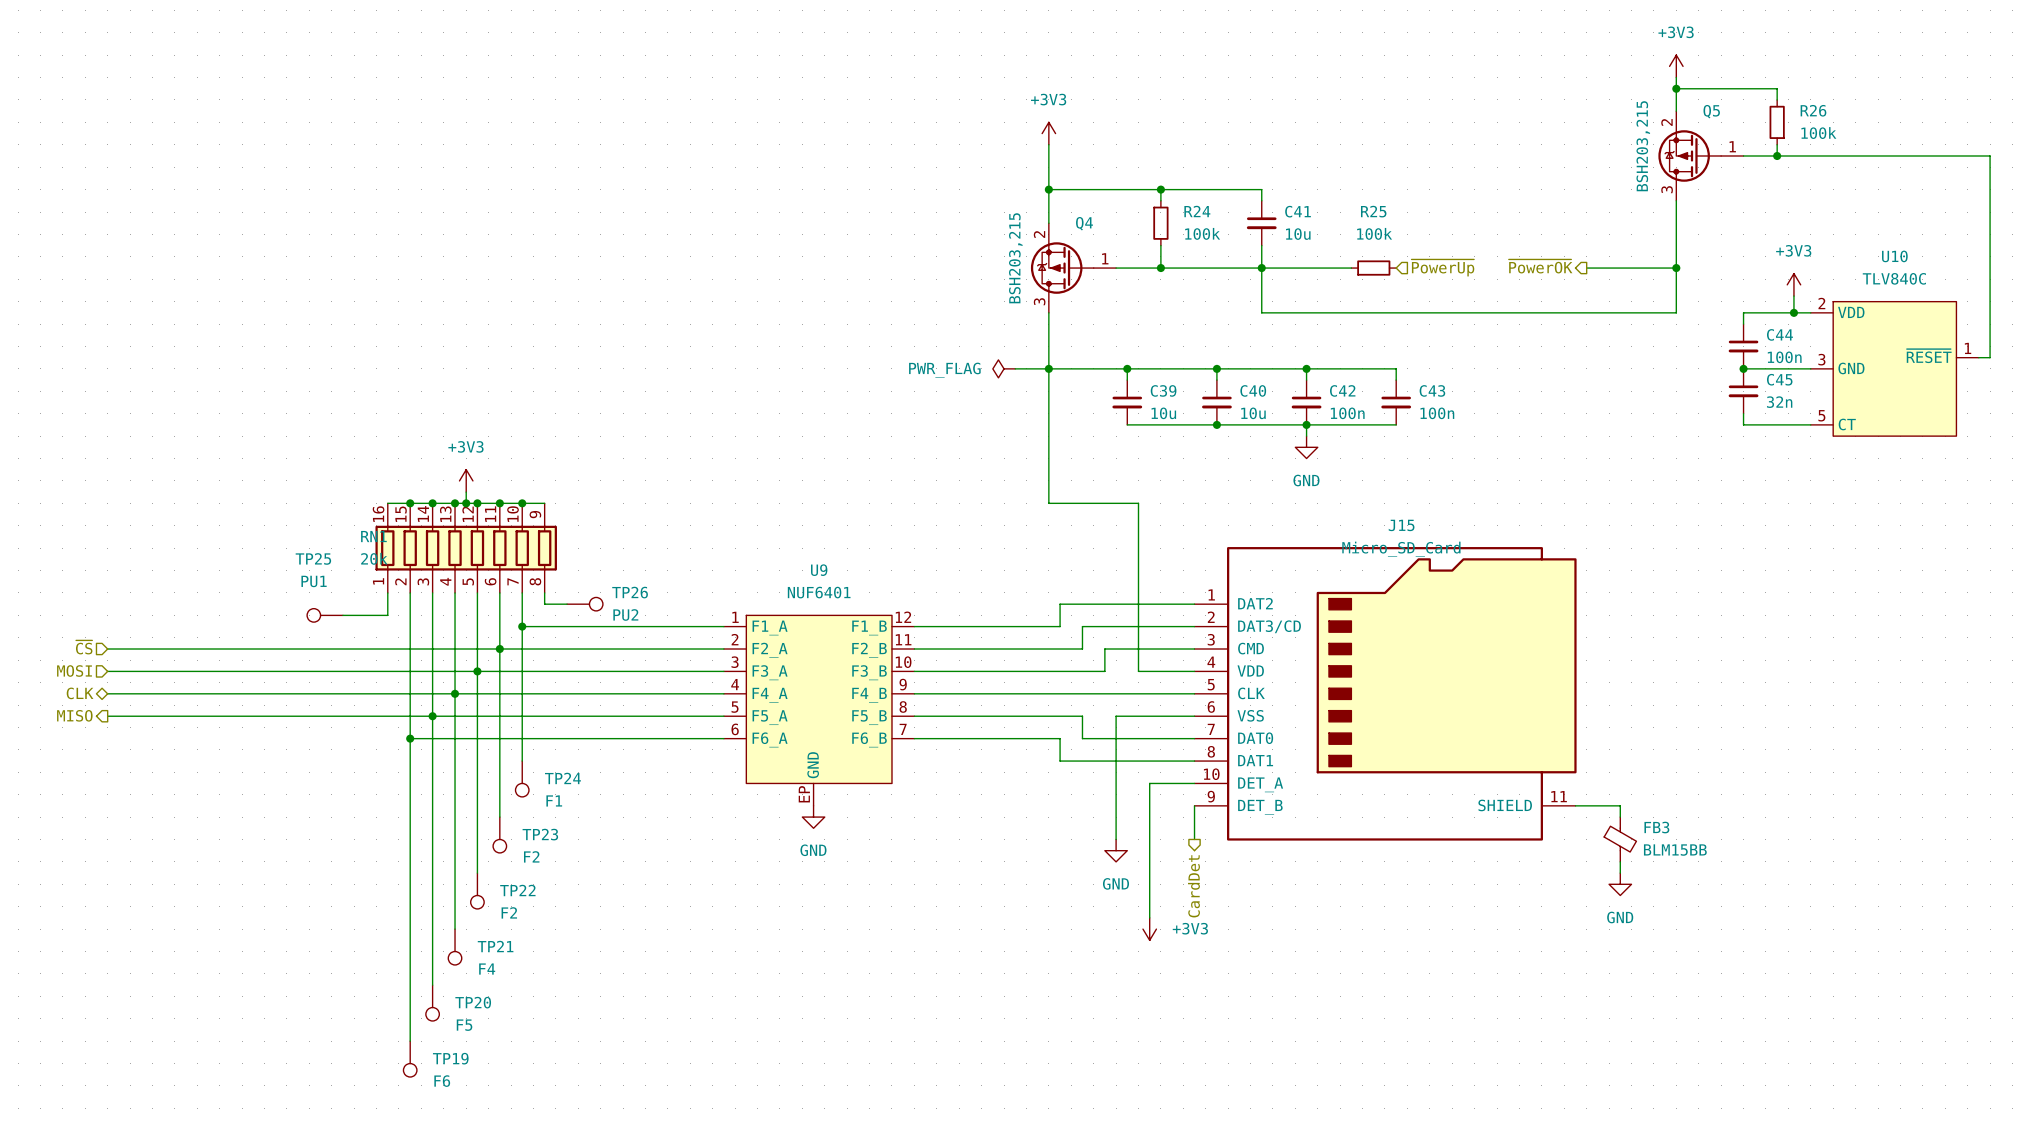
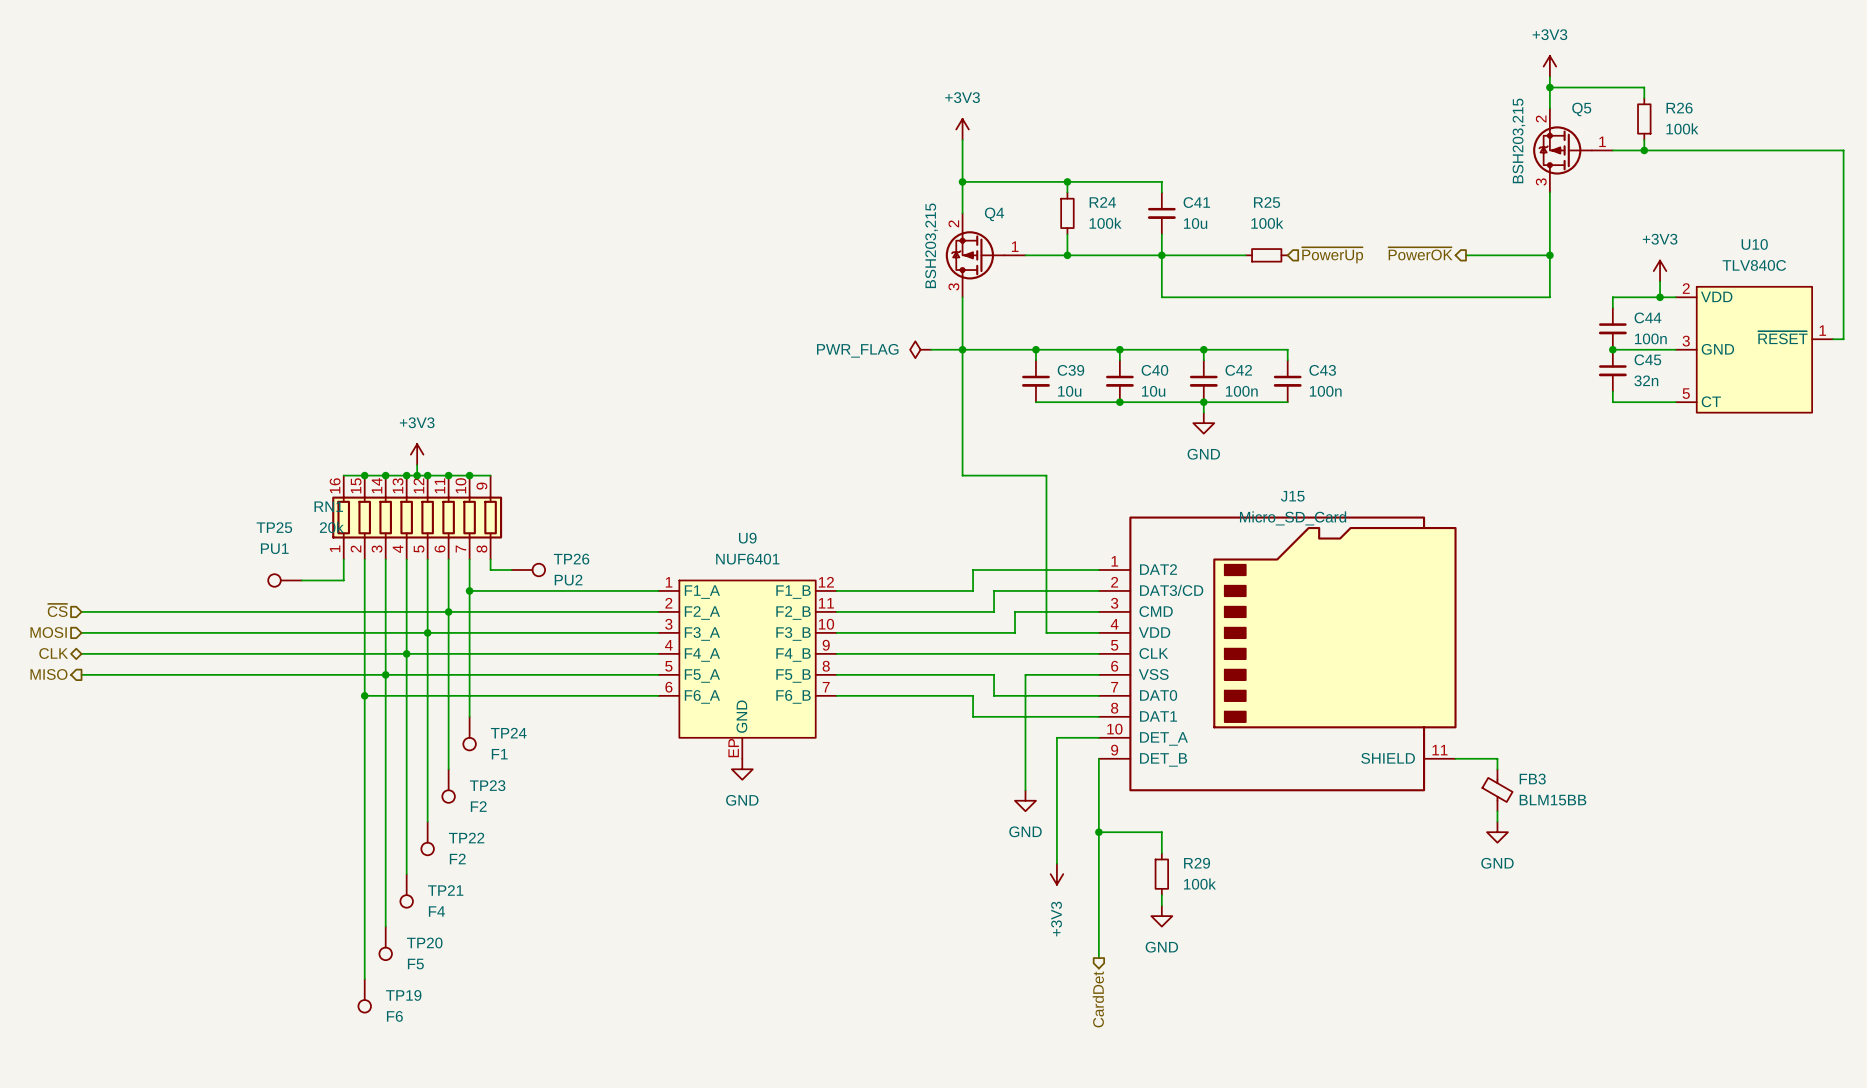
wire: none -> (1098, 790) (1098, 958)
wire: none -> (1098, 832) (1161, 832) (1161, 853)
junction: none -> (1098, 832)
hierarchical label position: CardDet (1193, 886) -> CardDet (1098, 999)
power symbol text rotation: 0° (1190, 928) -> 90° counterclockwise (1056, 919)
power symbol text position: +3V3 (1190, 928) -> +3V3 (1056, 919)
R29: none -> 100k (1161, 874)
wire: none -> (1161, 895) (1161, 905)
power symbol: none -> GND (1161, 916)

